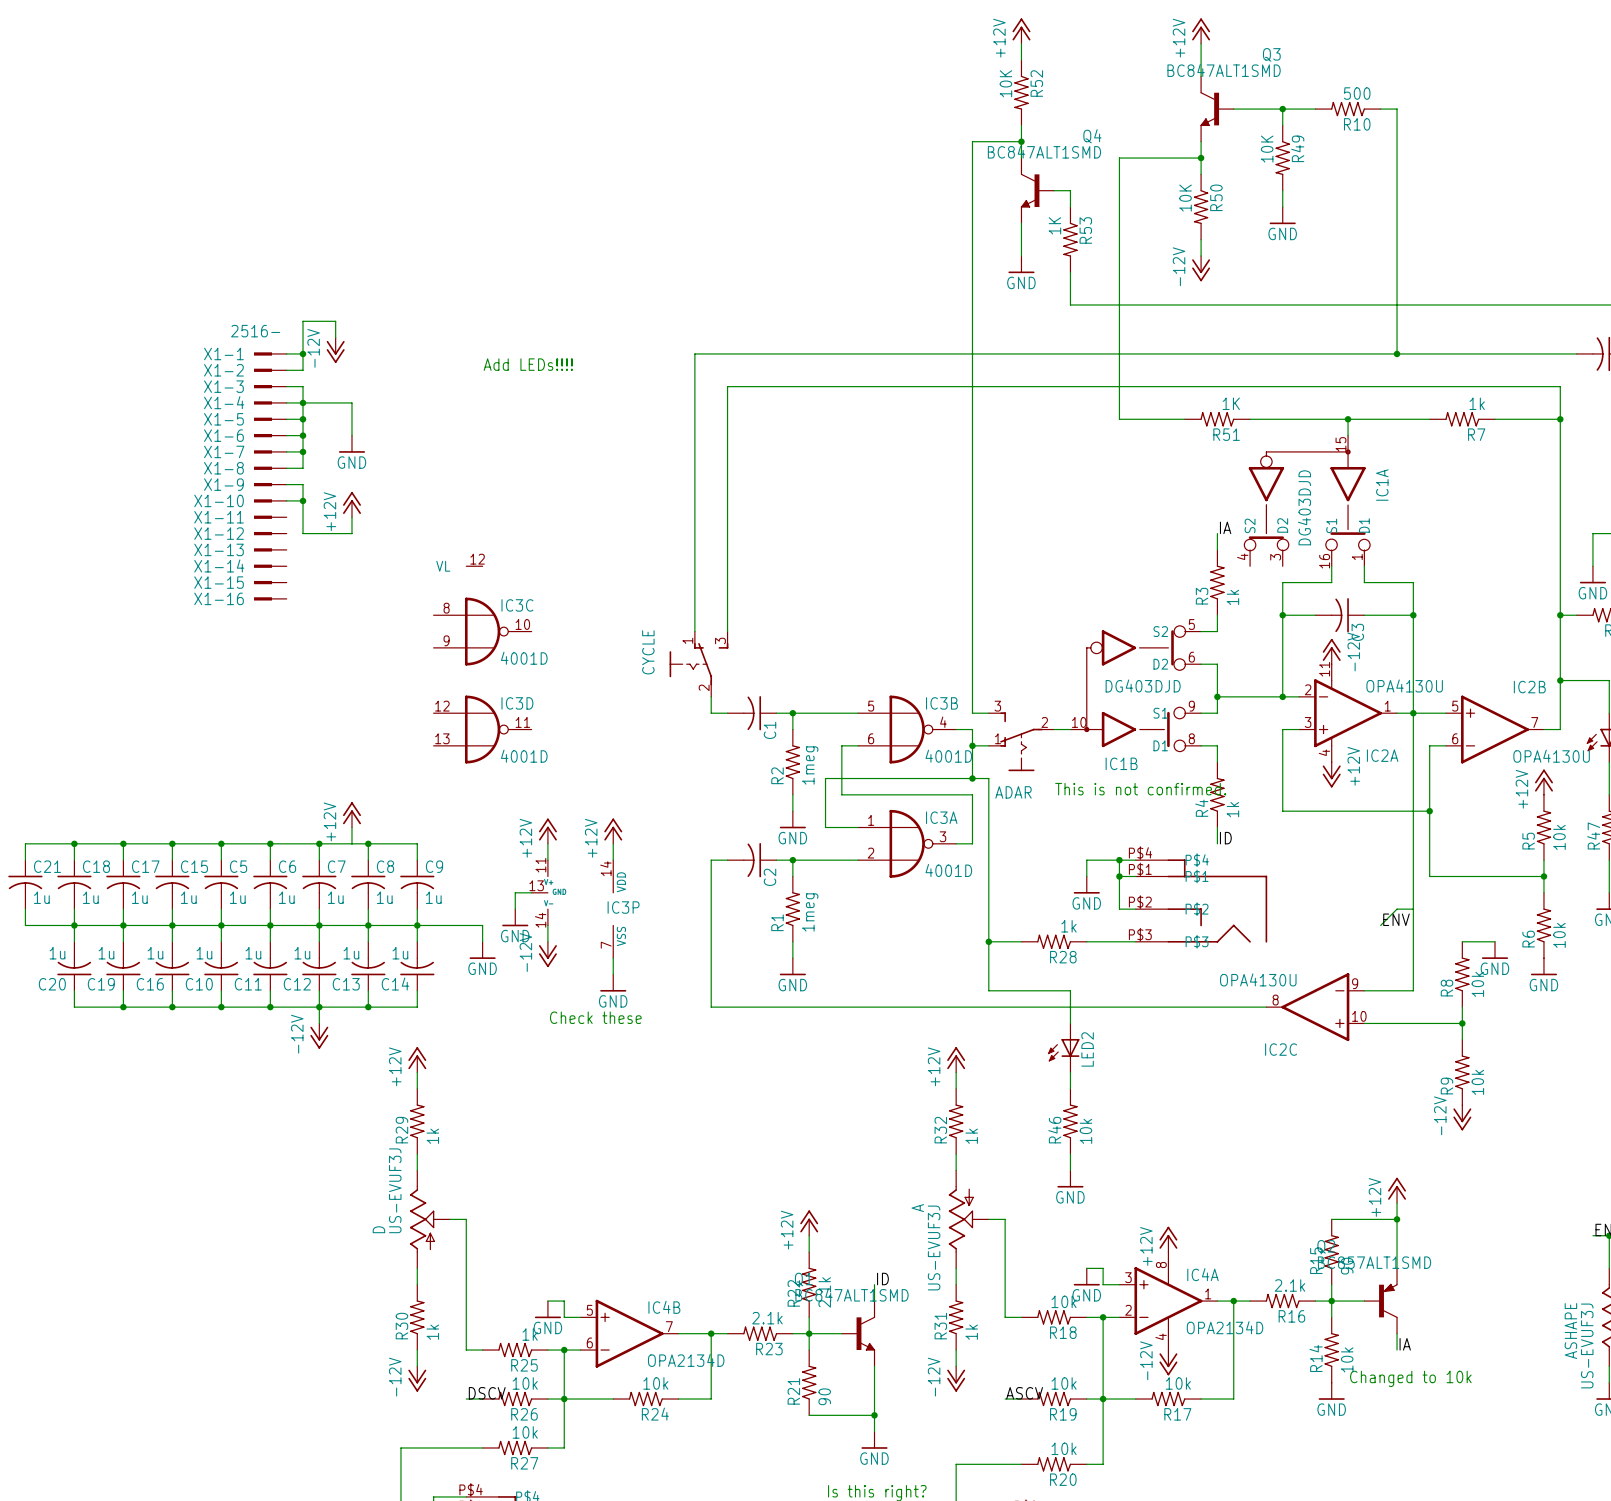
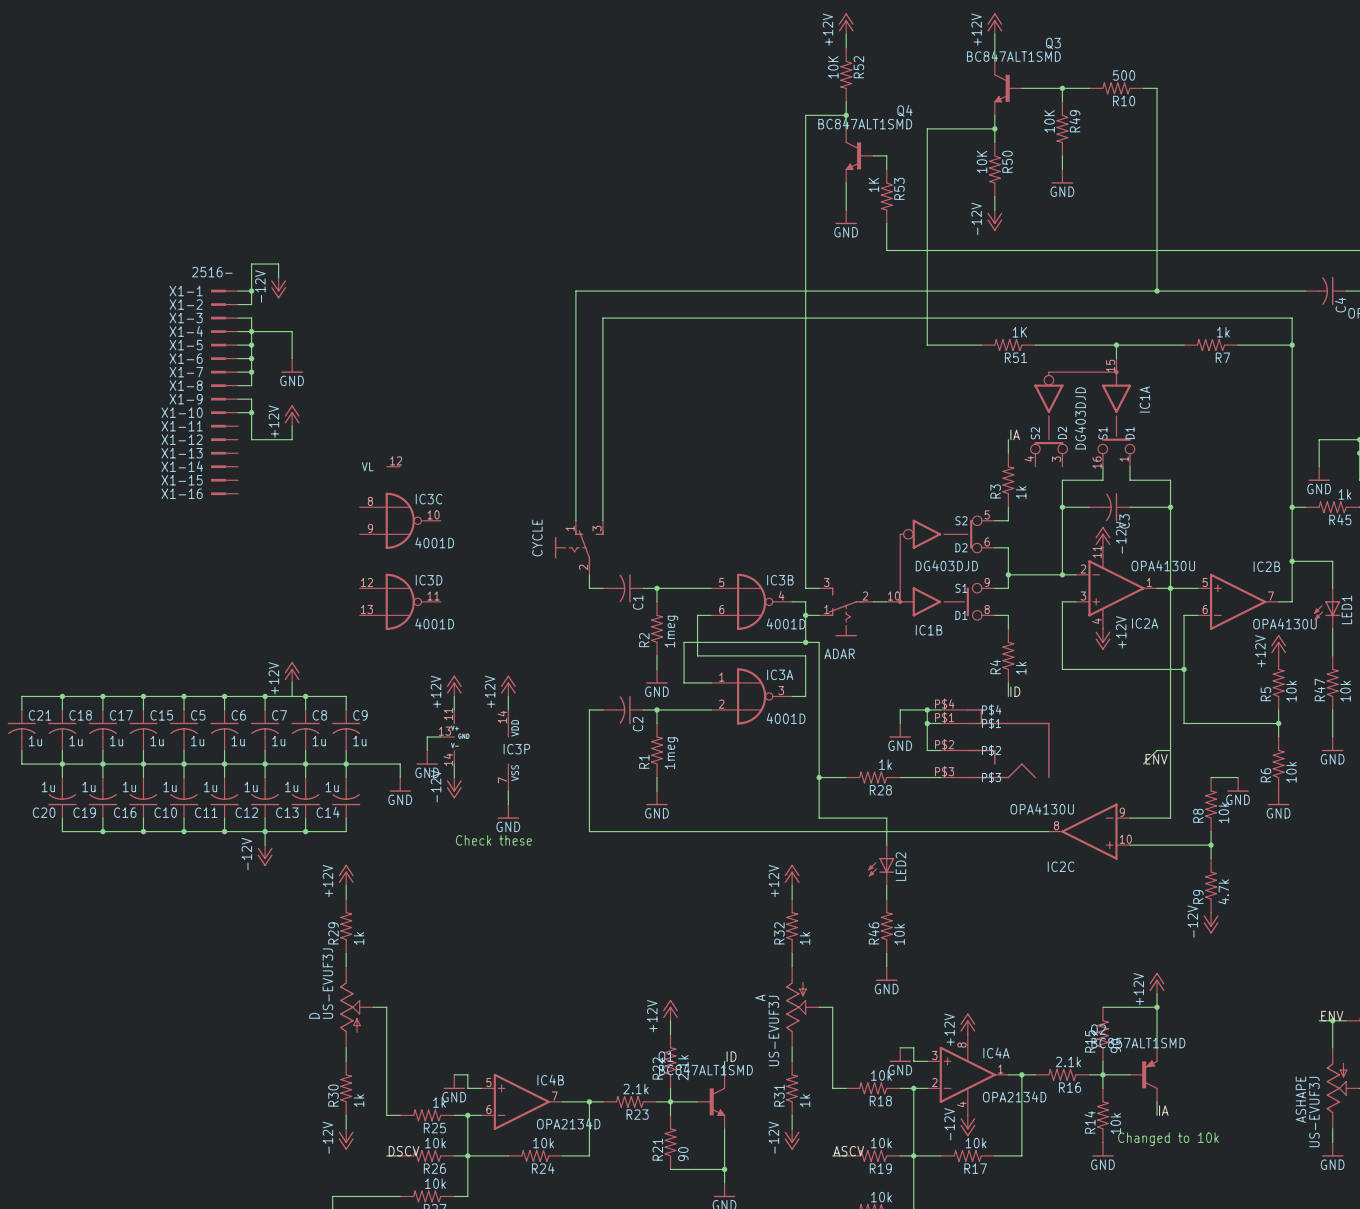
text: Add LEDs!!!! (528, 364) -> none
text: This is not confirmed. (1140, 789) -> none
R9 value: 10k (1477, 1082) -> 4.7k (1223, 891)

